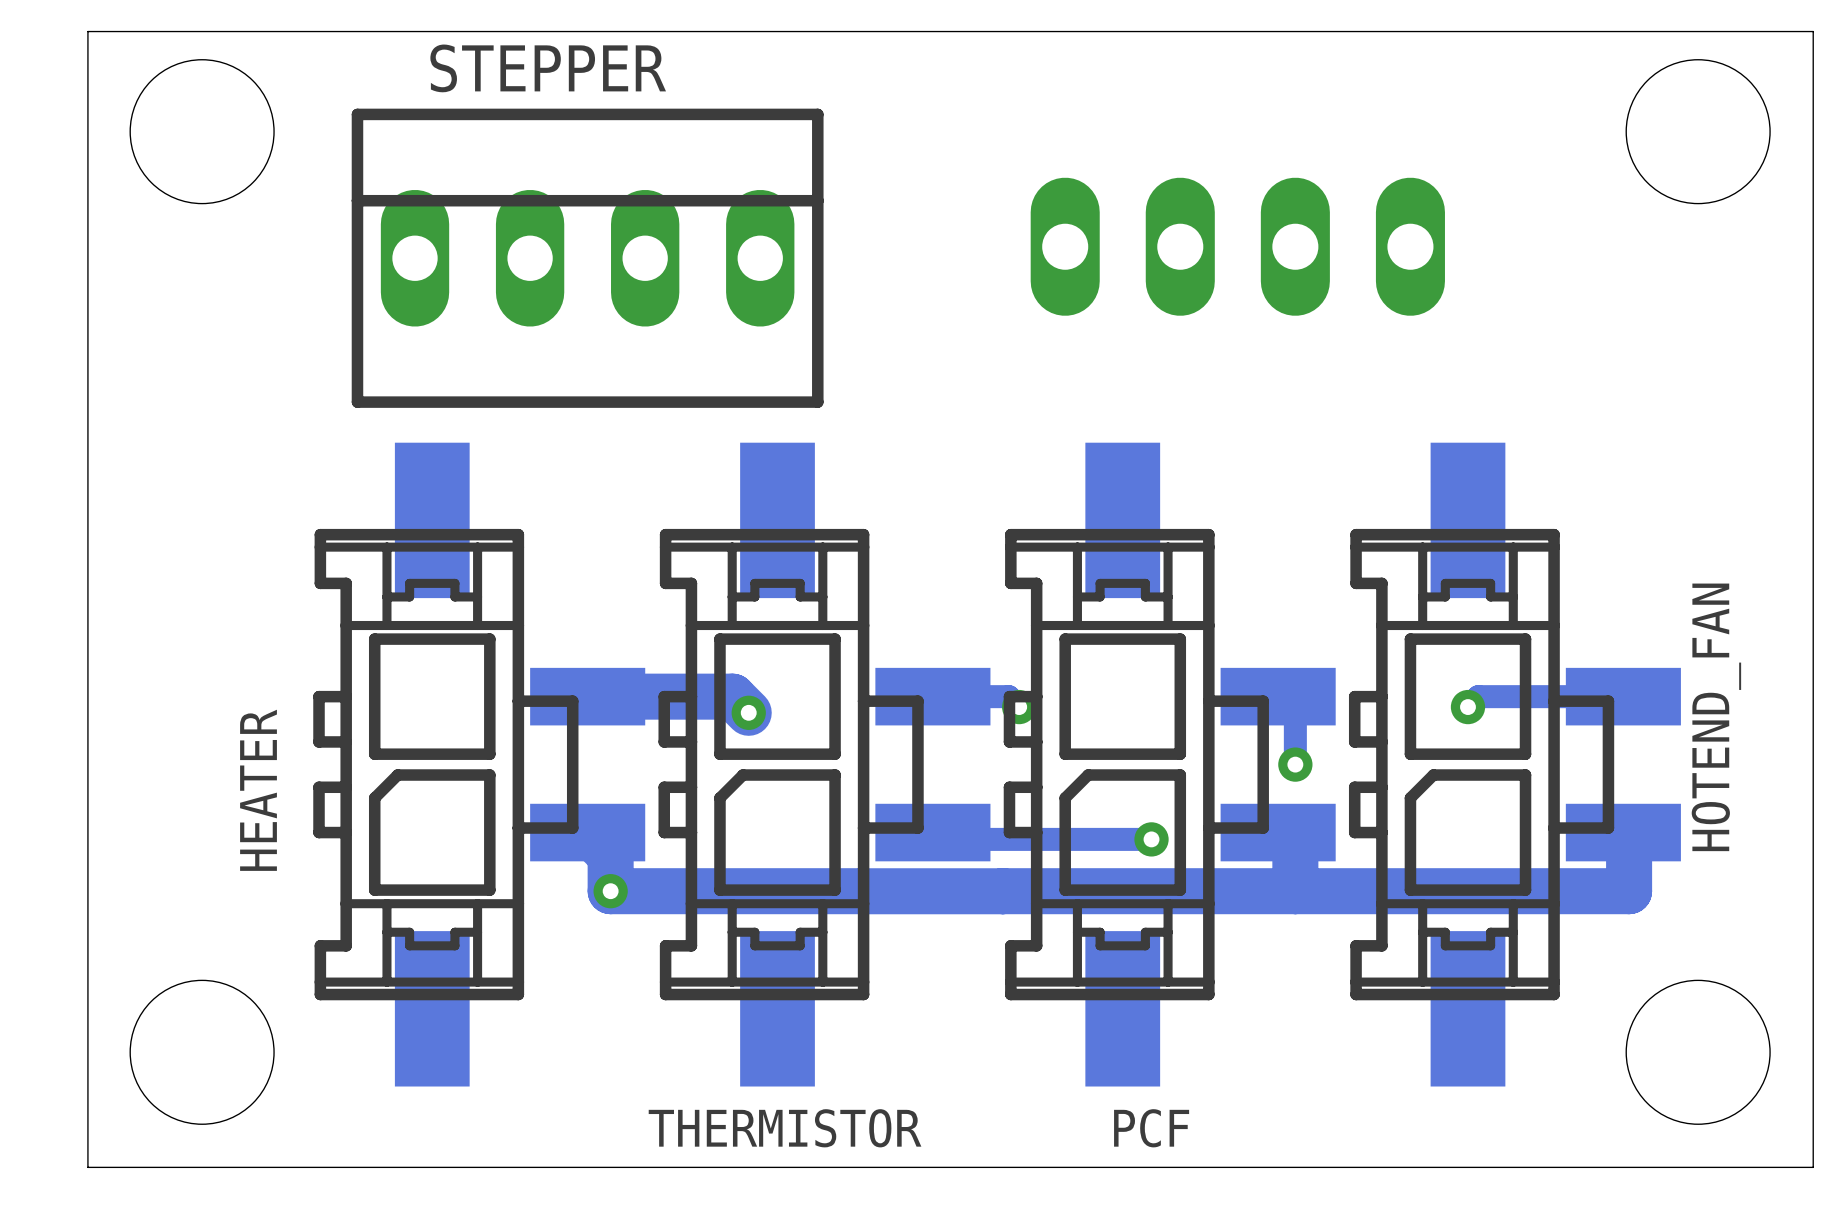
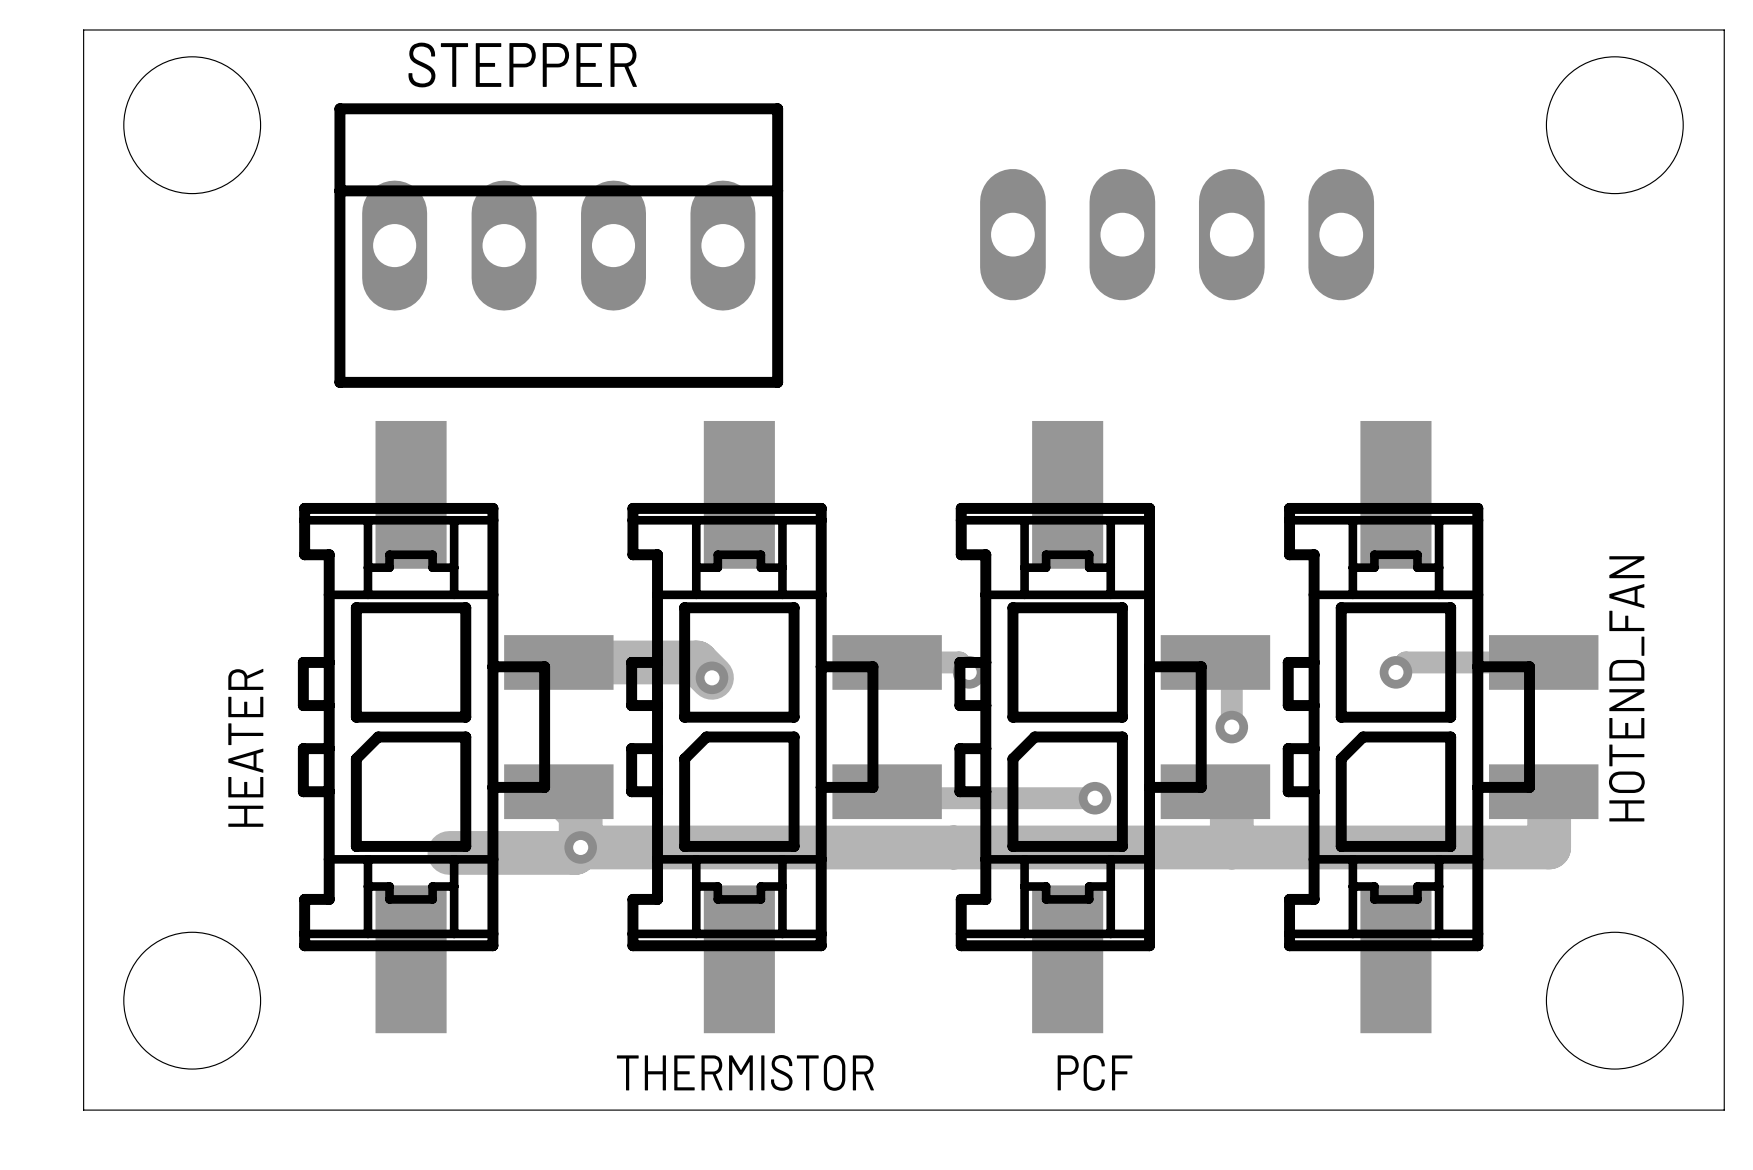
track: none -> (580, 847) (575, 852) (449, 852)

